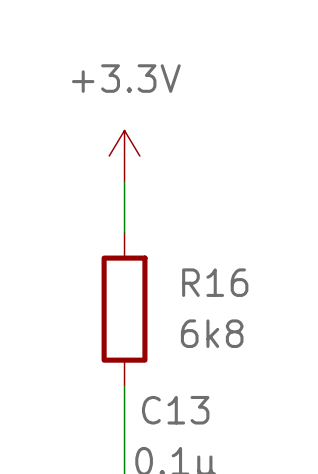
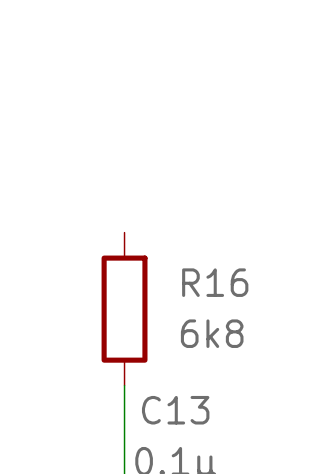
power symbol: +3.3V (124, 156) -> none
wire: (124, 181) (124, 232) -> none

